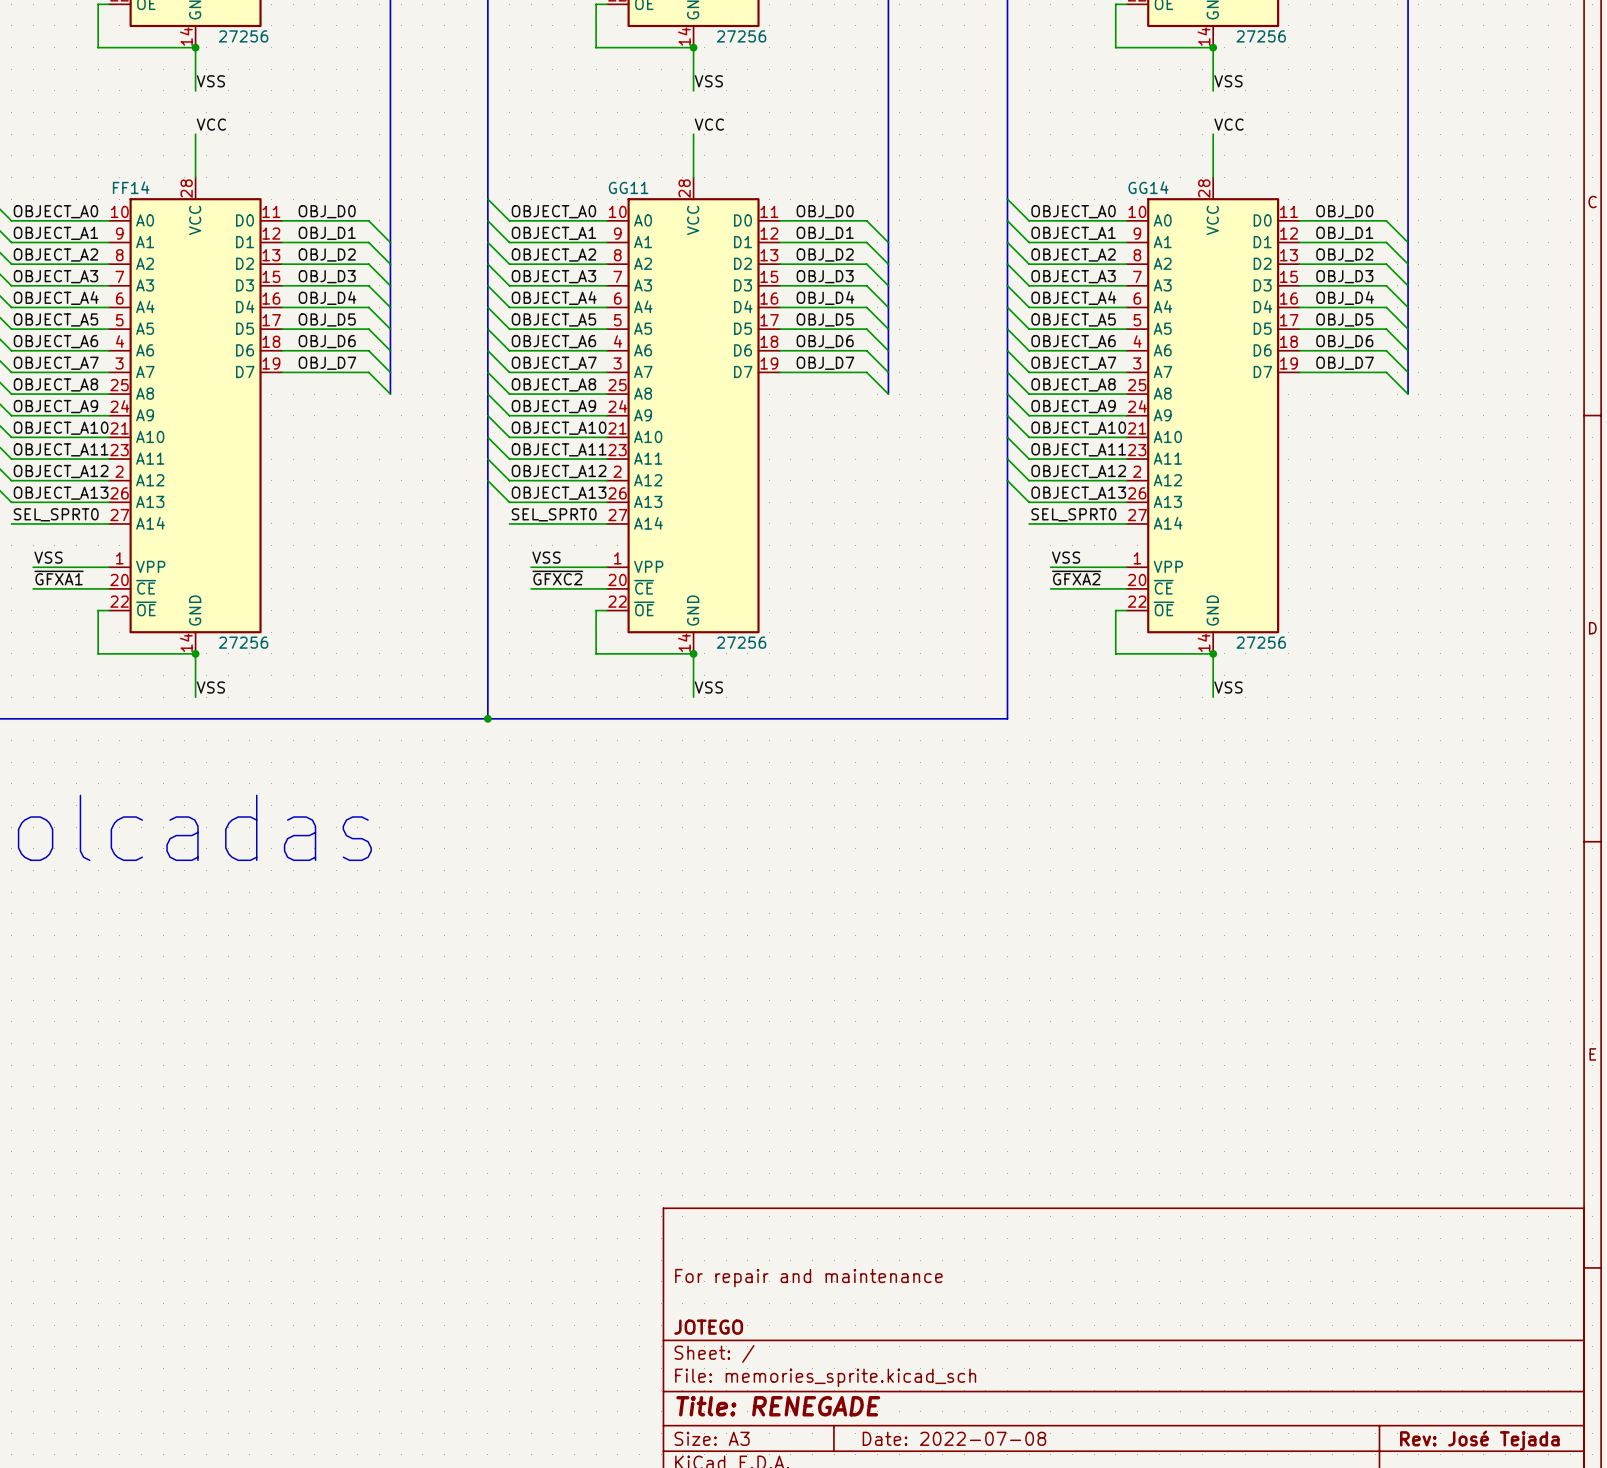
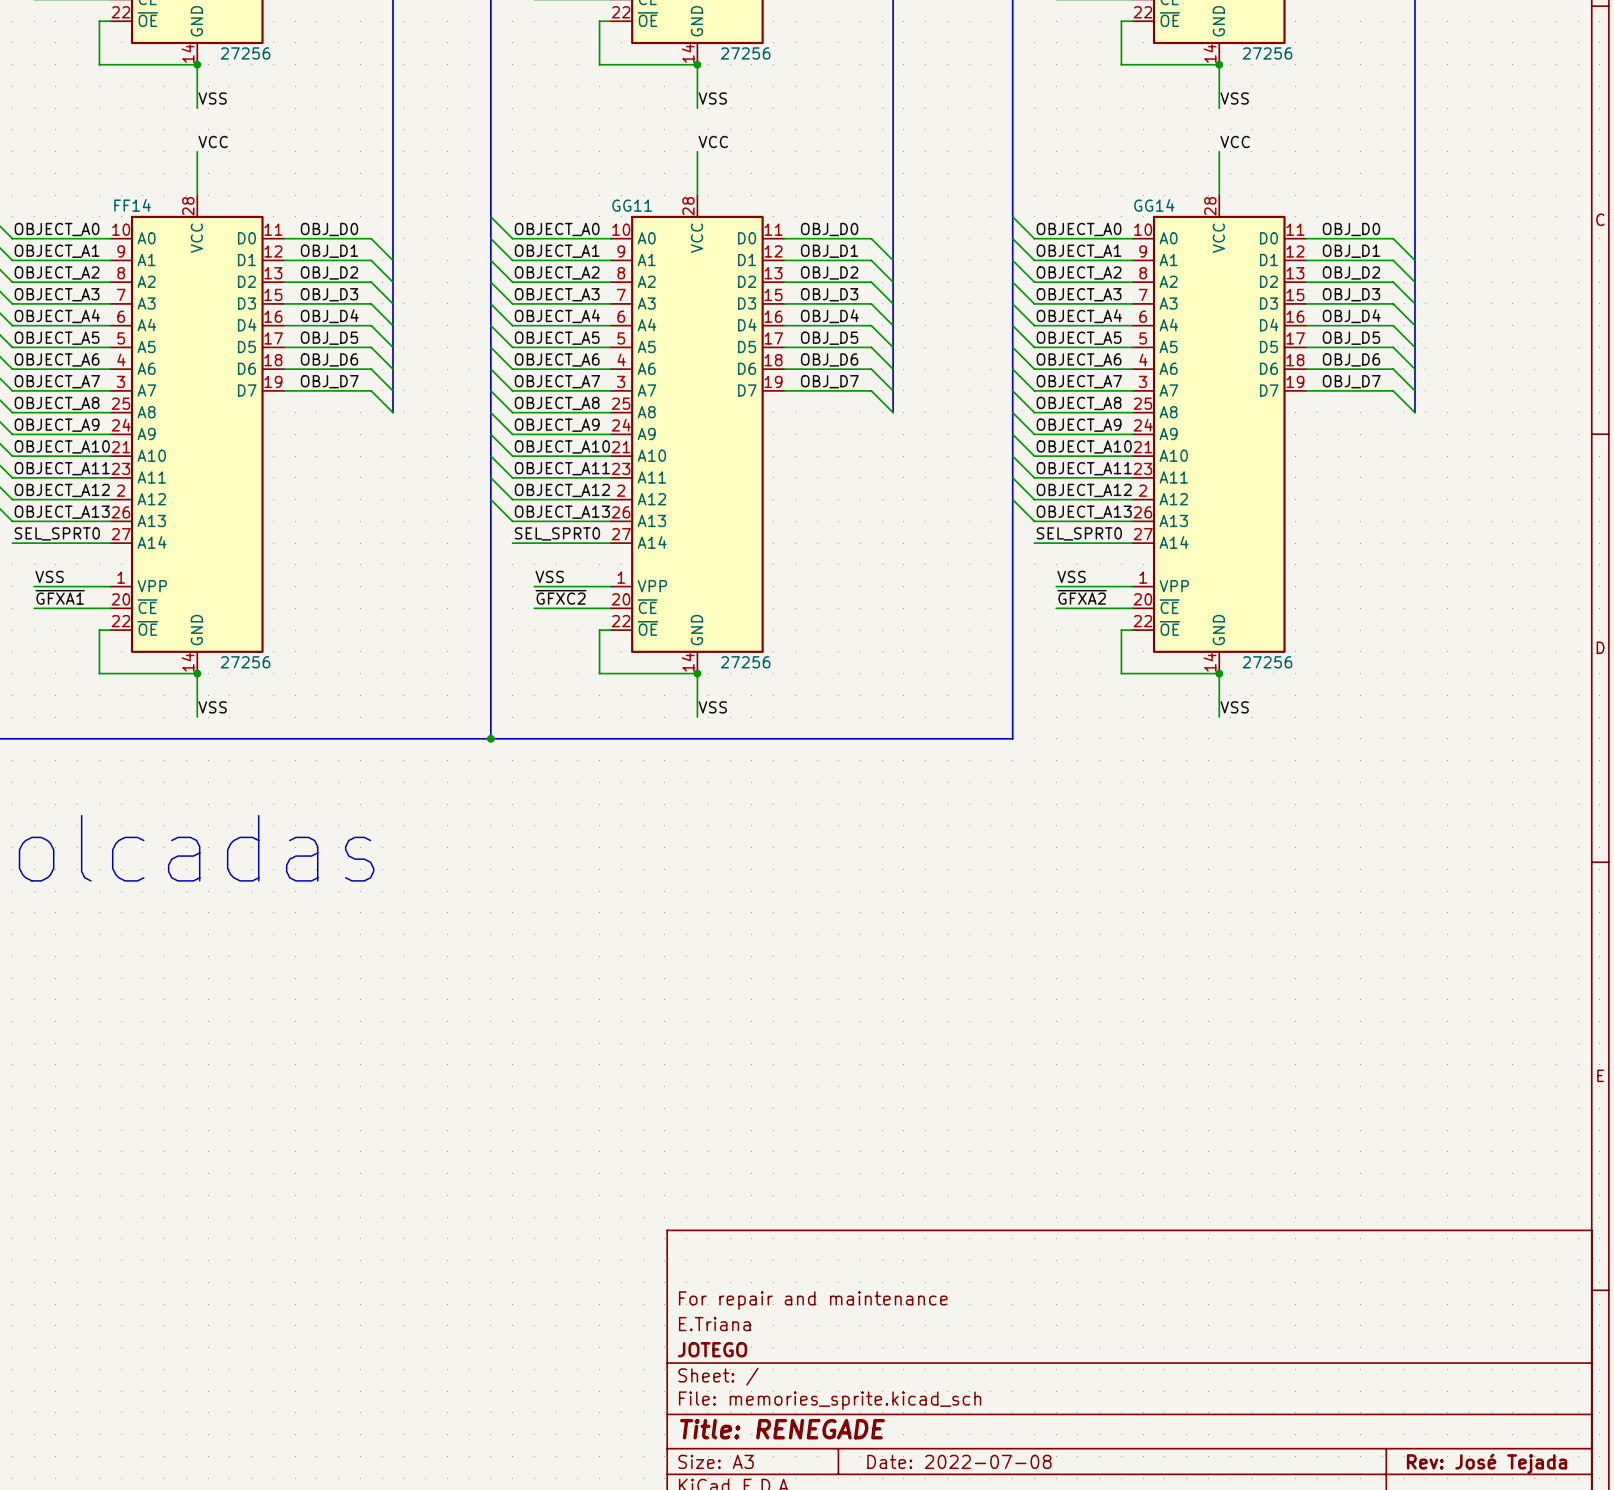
title block: none -> E.Triana (714, 1324)

